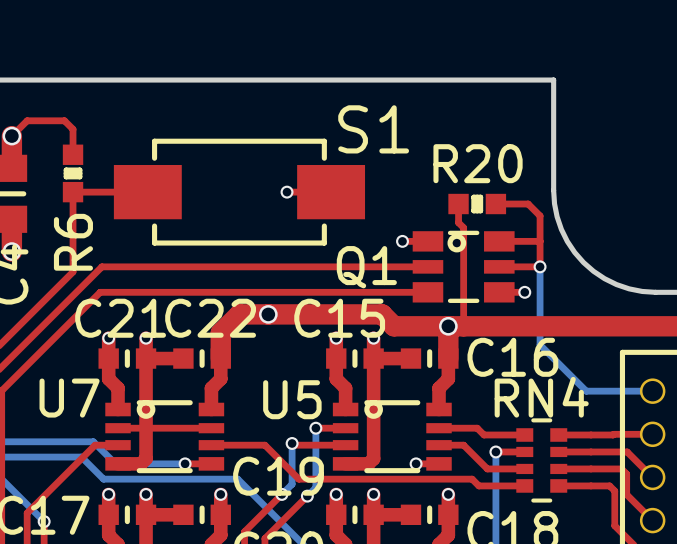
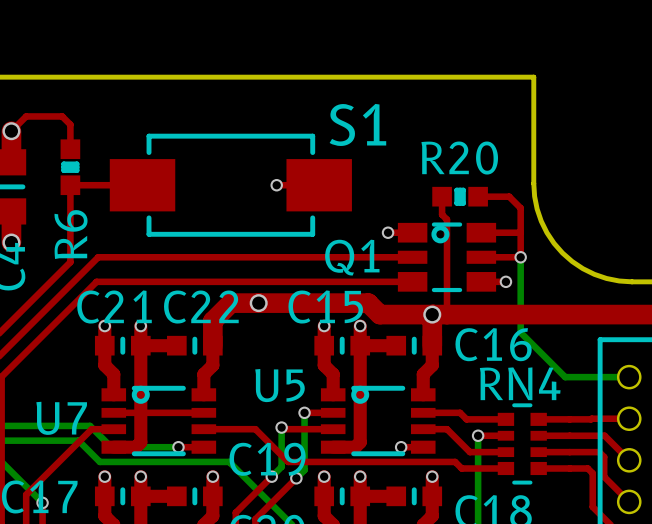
U7 name position: U7 (69, 398) -> U7 (61, 418)

